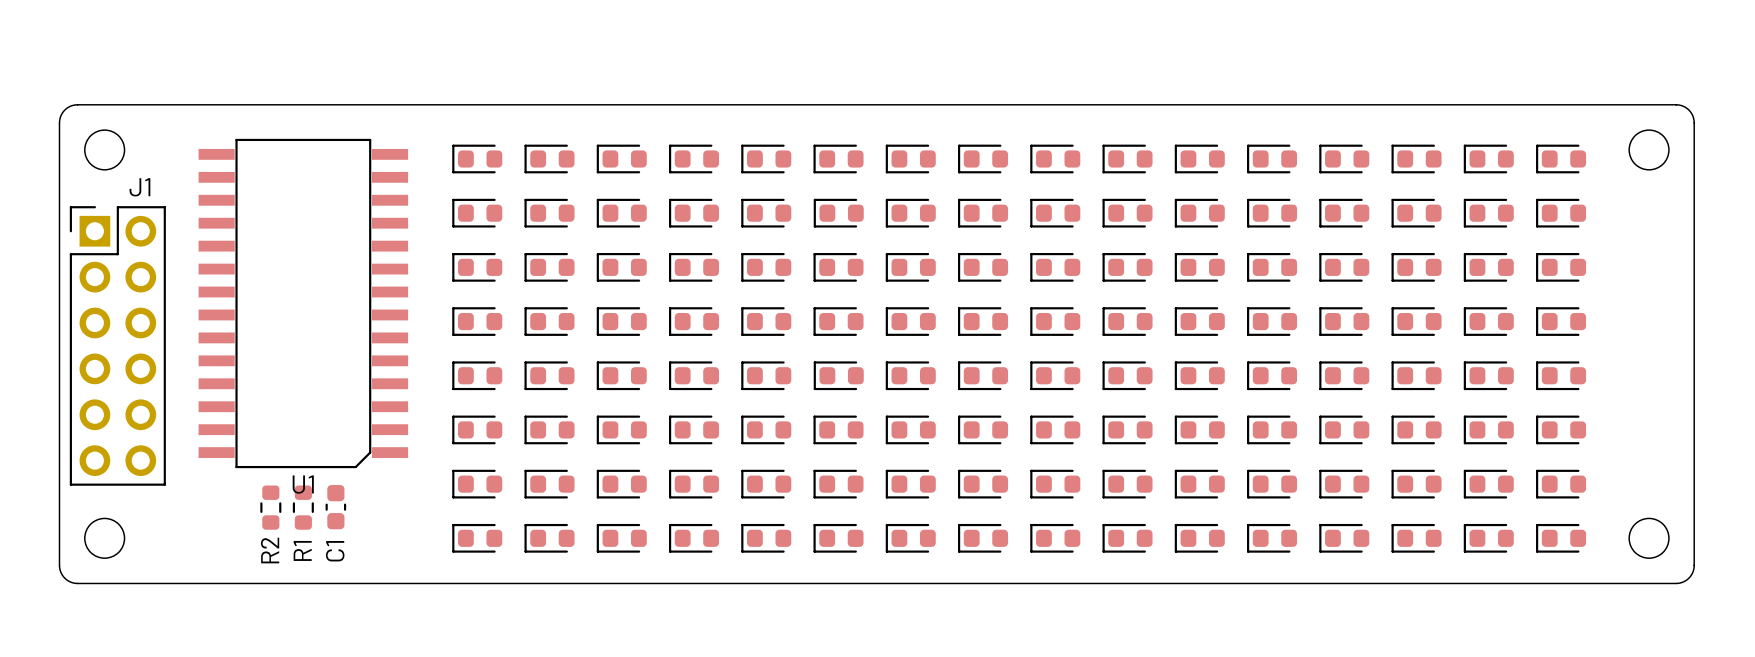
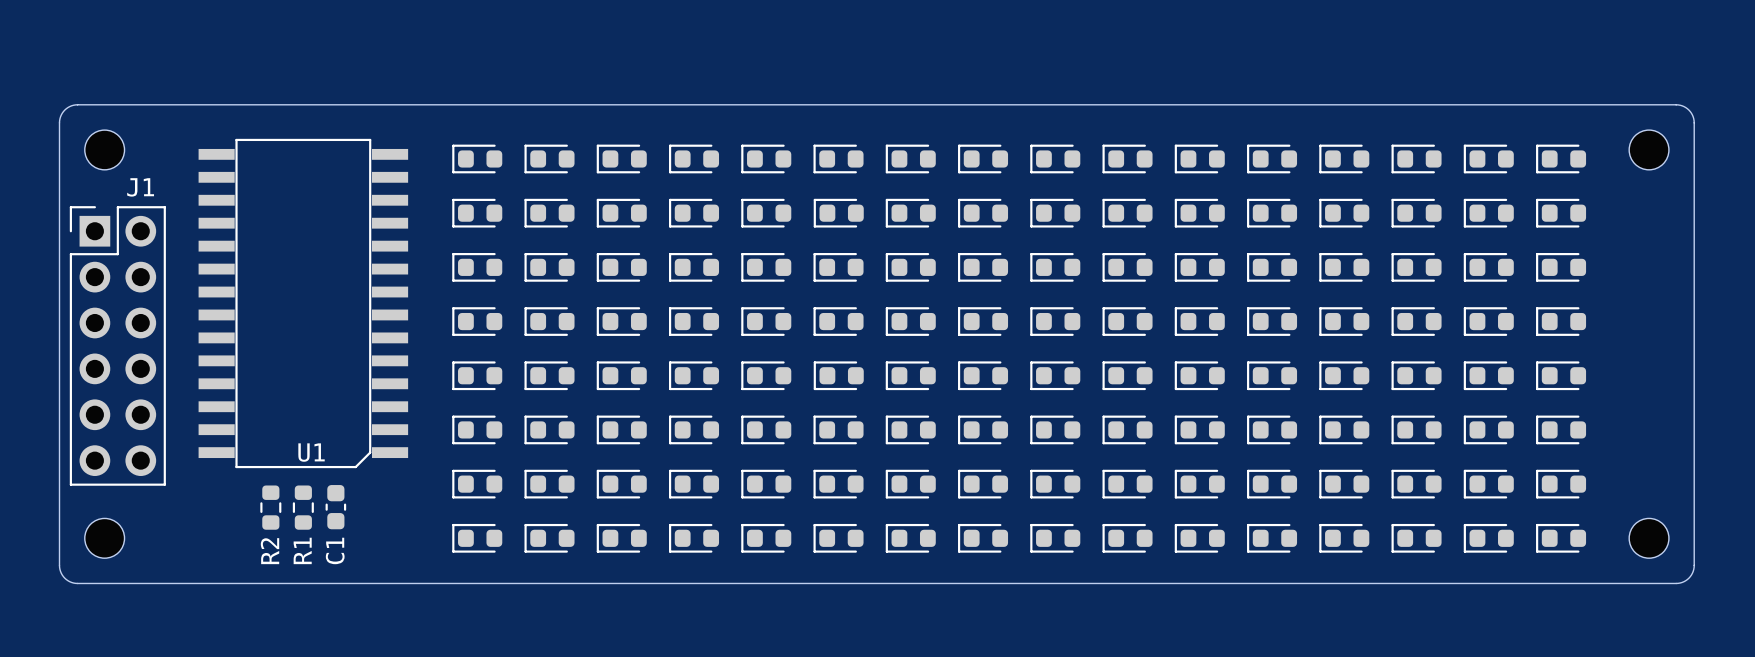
U1 name position: U1 (303, 484) -> U1 (311, 452)

